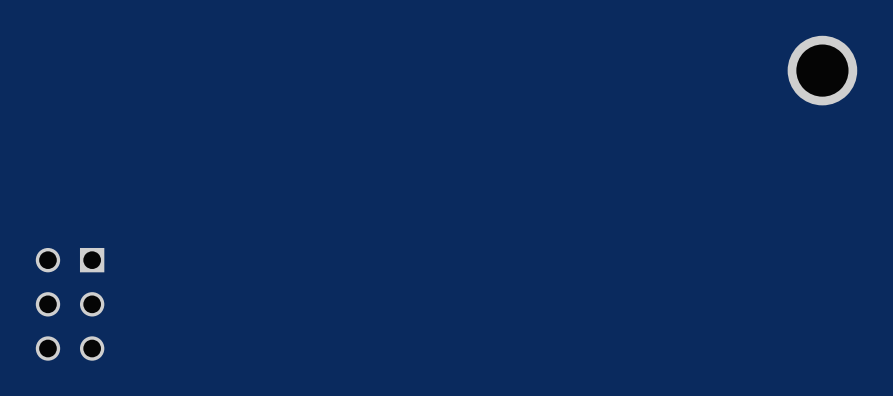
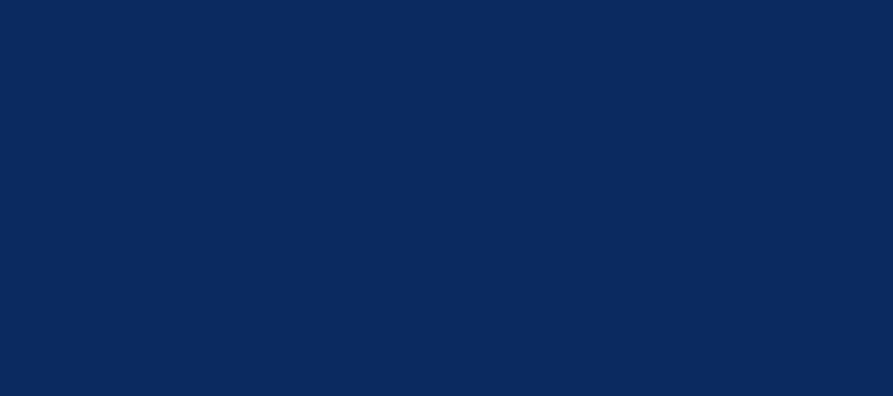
part: (822, 70) -> none
part: (70, 304) -> none

